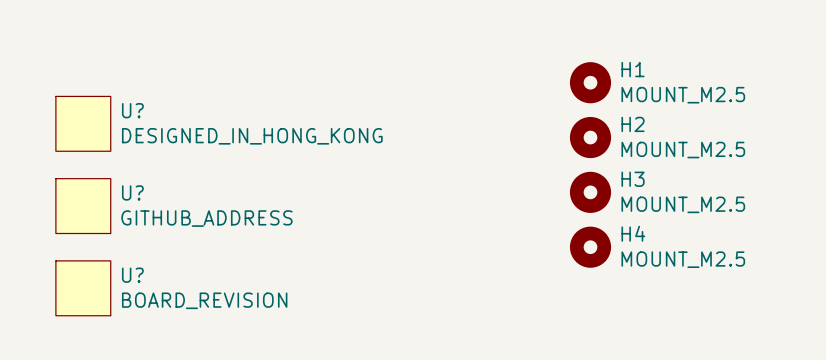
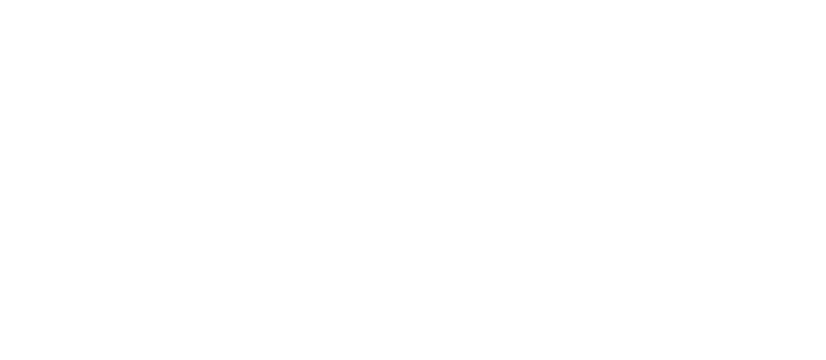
H1: MOUNT_M2.5 (590, 82) -> none
U?: DESIGNED_IN_HONG_KONG (83, 123) -> none
H2: MOUNT_M2.5 (590, 137) -> none
H3: MOUNT_M2.5 (590, 192) -> none
U?: GITHUB_ADDRESS (83, 206) -> none
H4: MOUNT_M2.5 (590, 247) -> none
U?: BOARD_REVISION (83, 288) -> none

